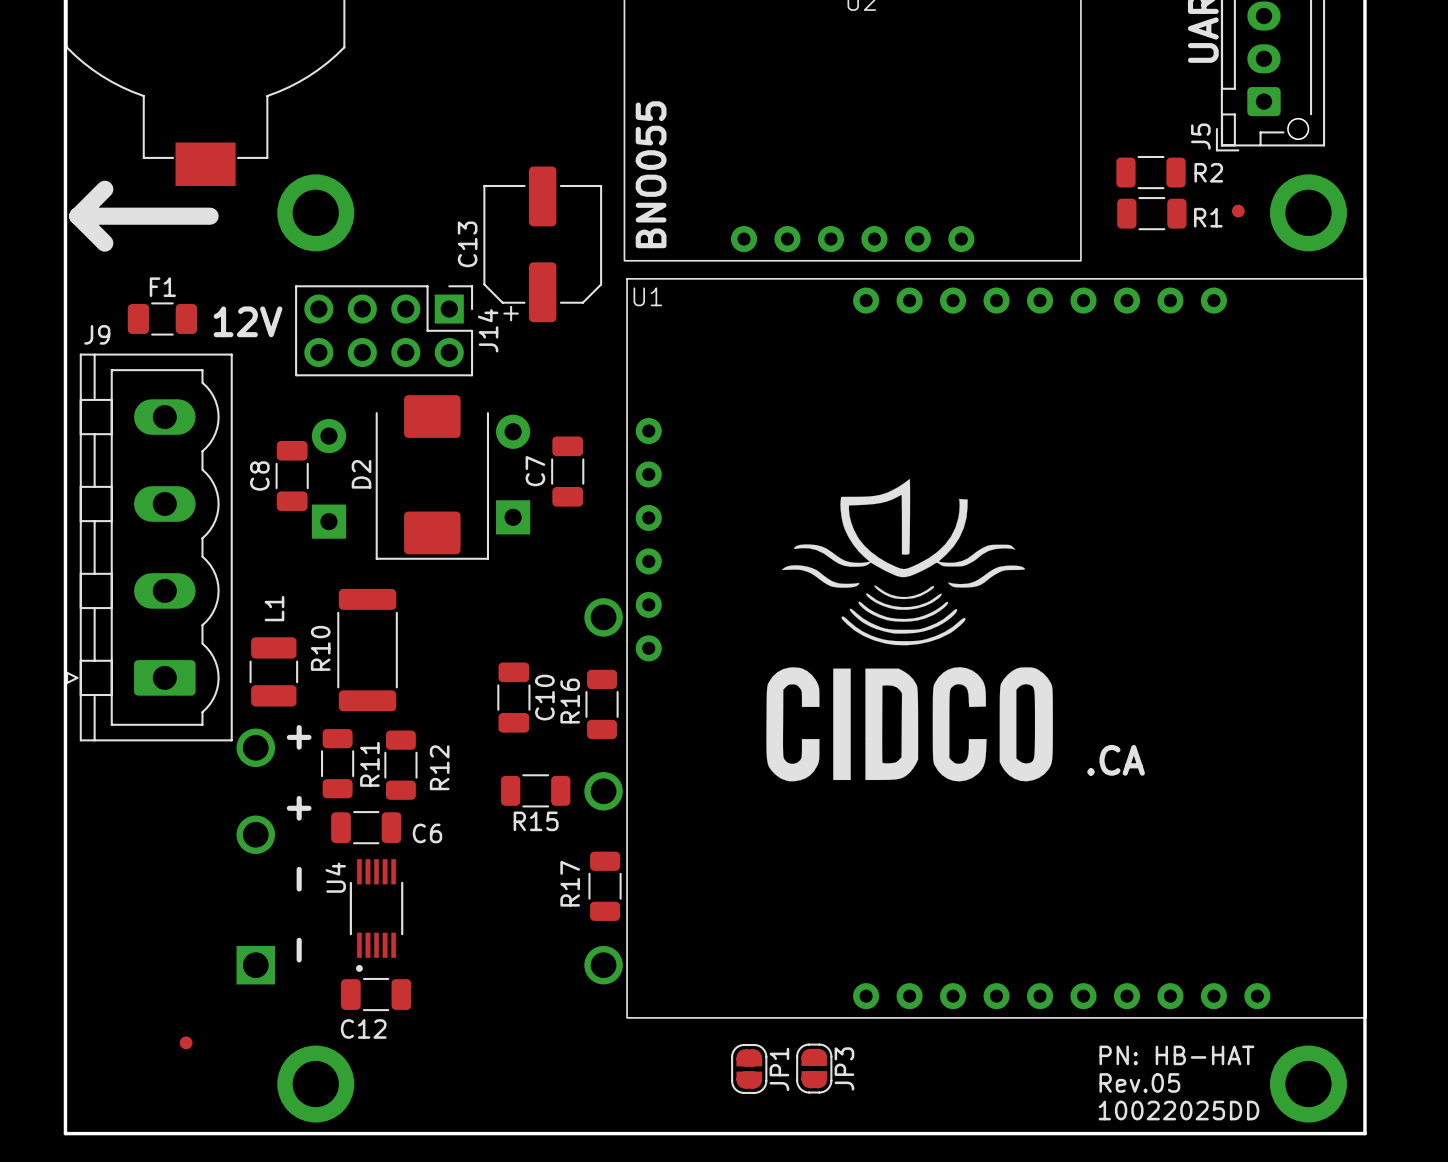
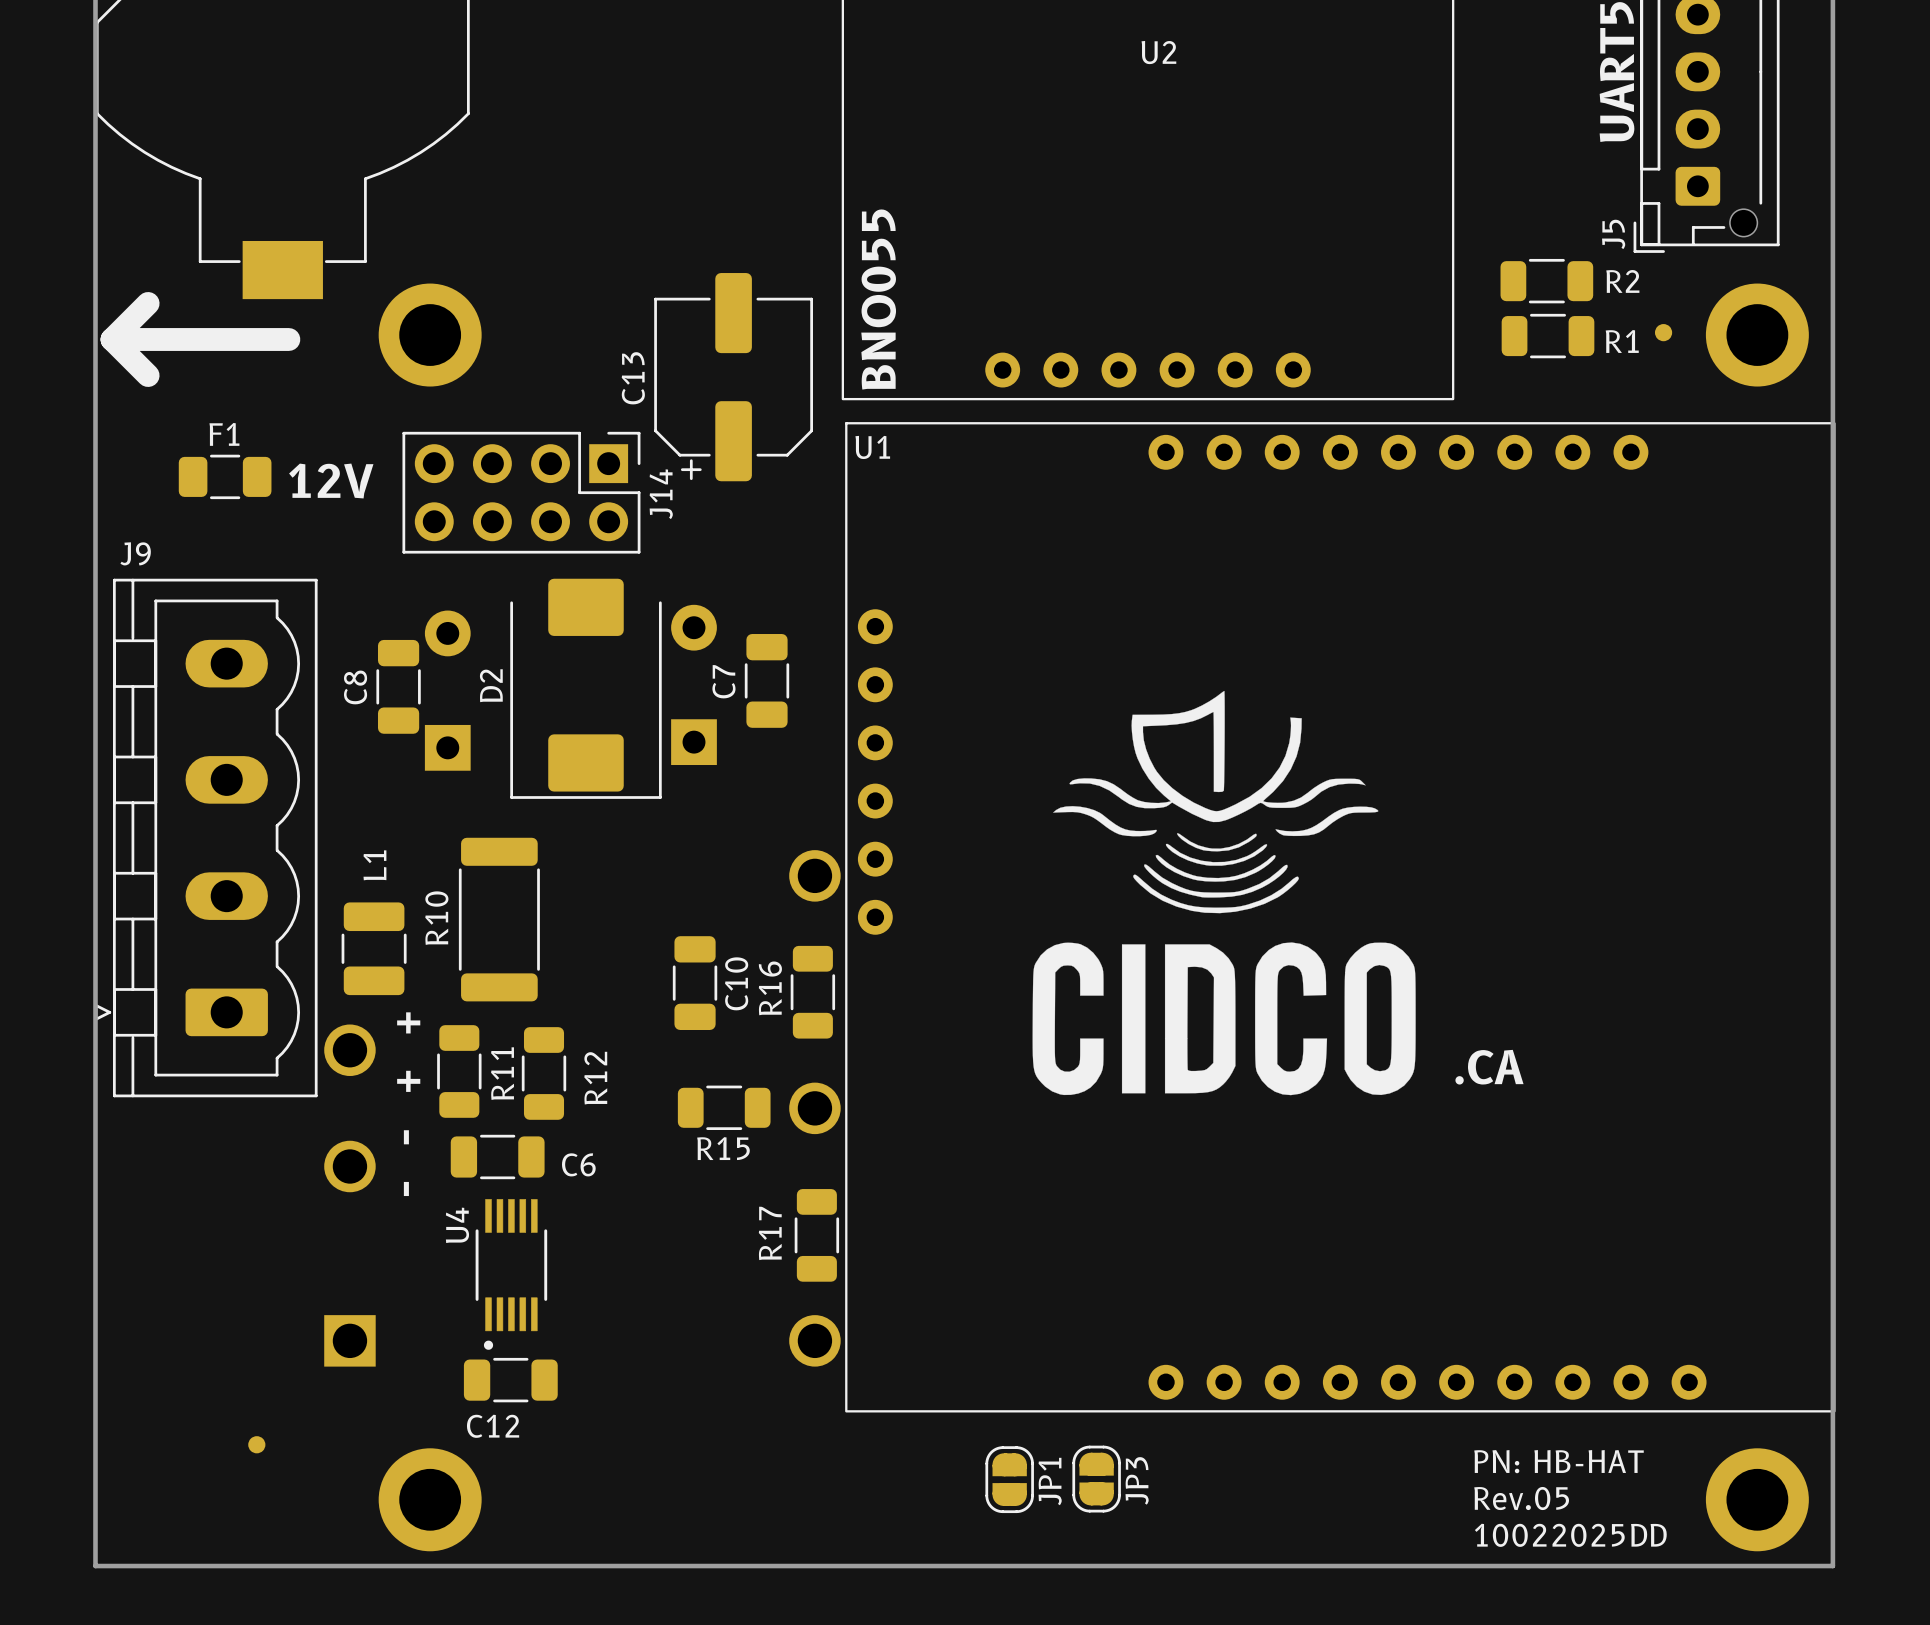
J9 position: (149, 547) -> (206, 838)

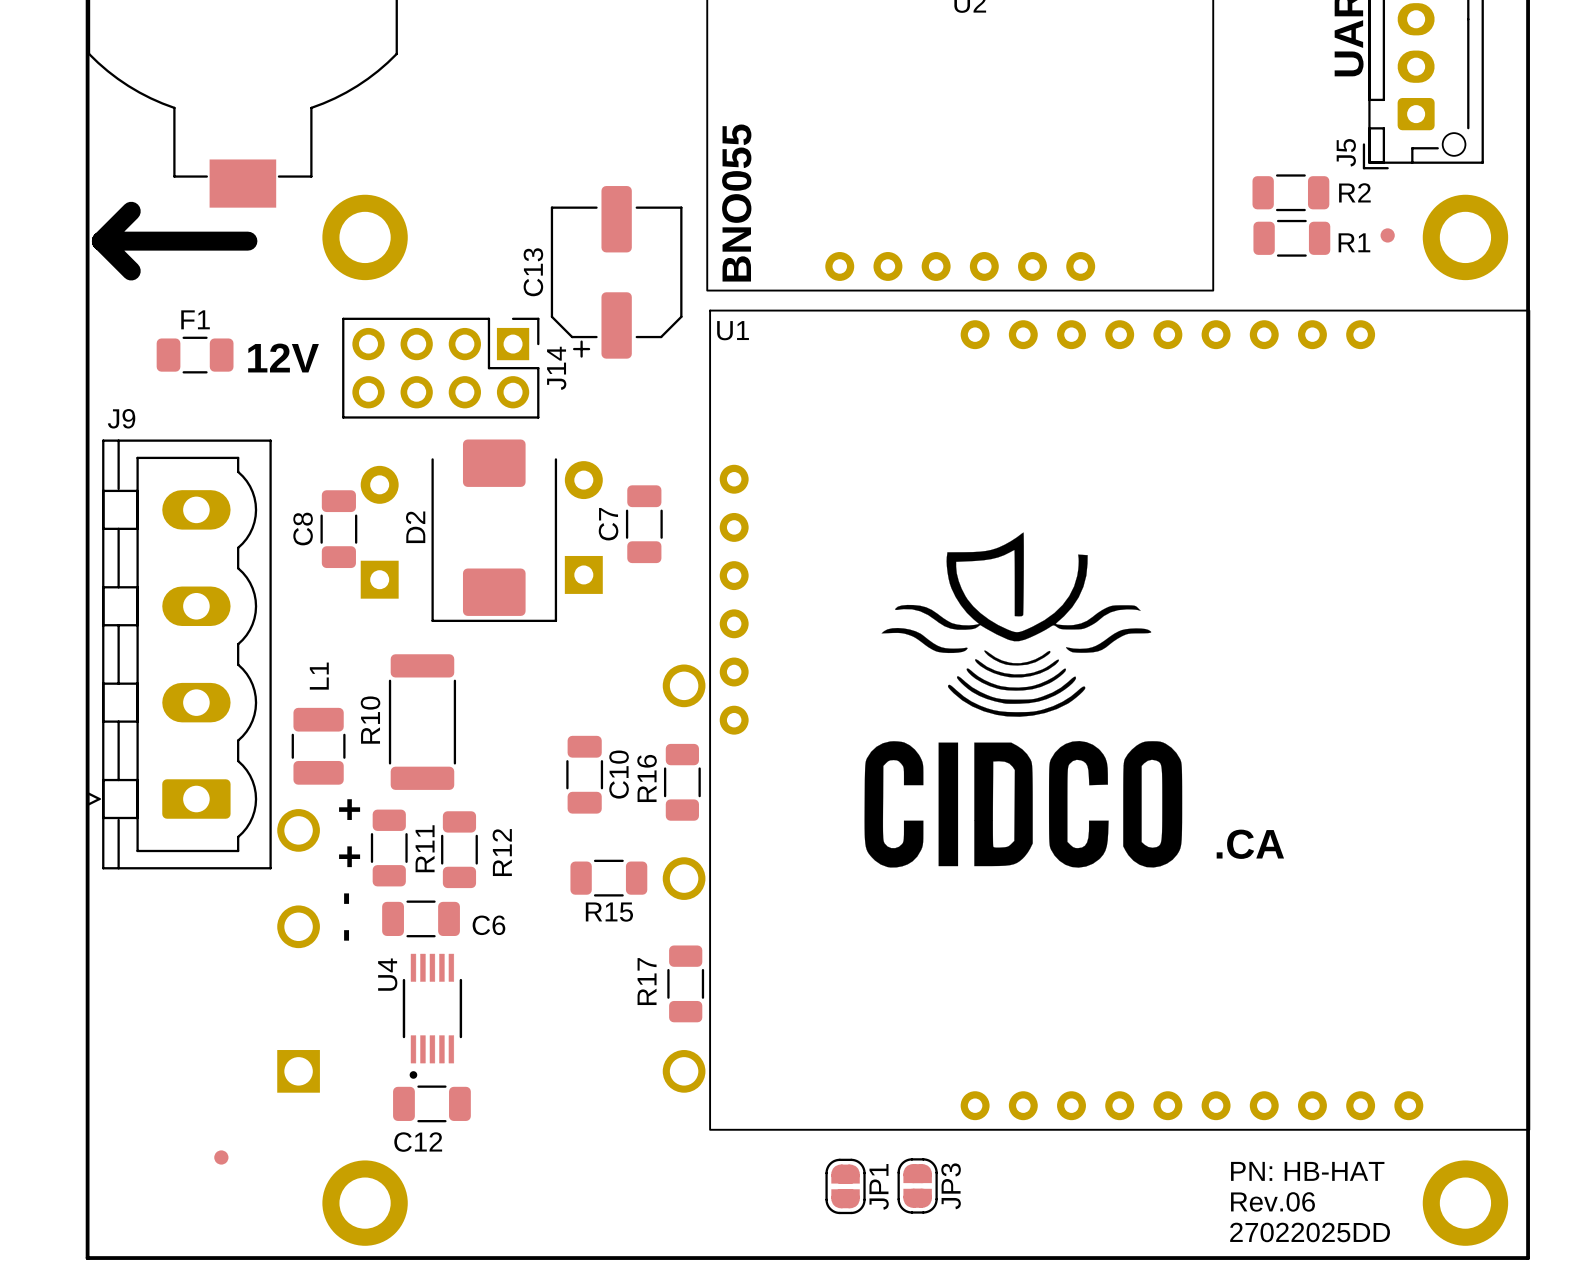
text: Rev.05 (1521, 1498) -> Rev.06 (1272, 1201)
text: 10022025DD (1570, 1535) -> 27022025DD (1310, 1232)

